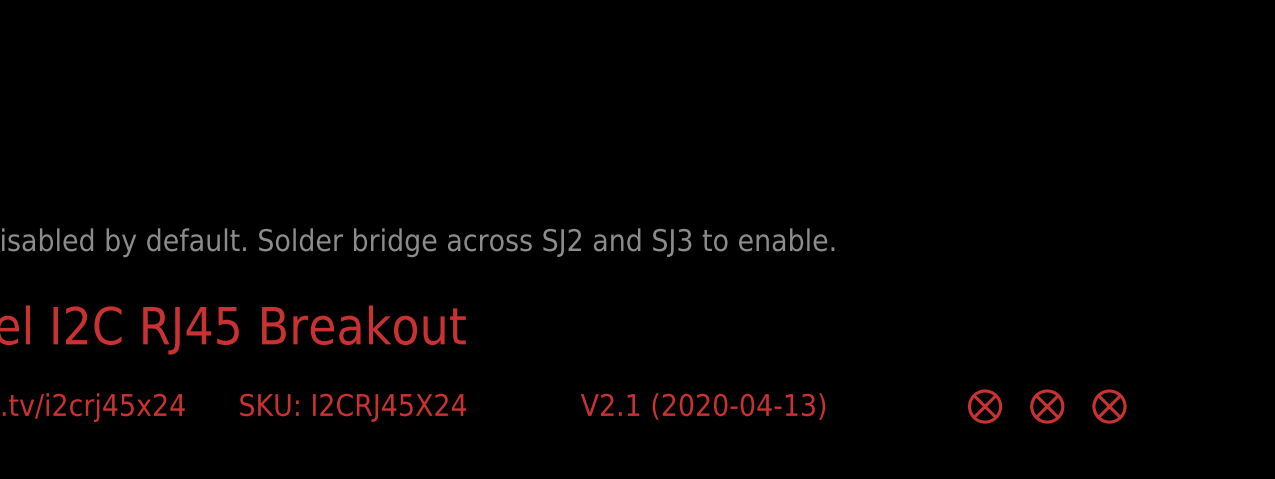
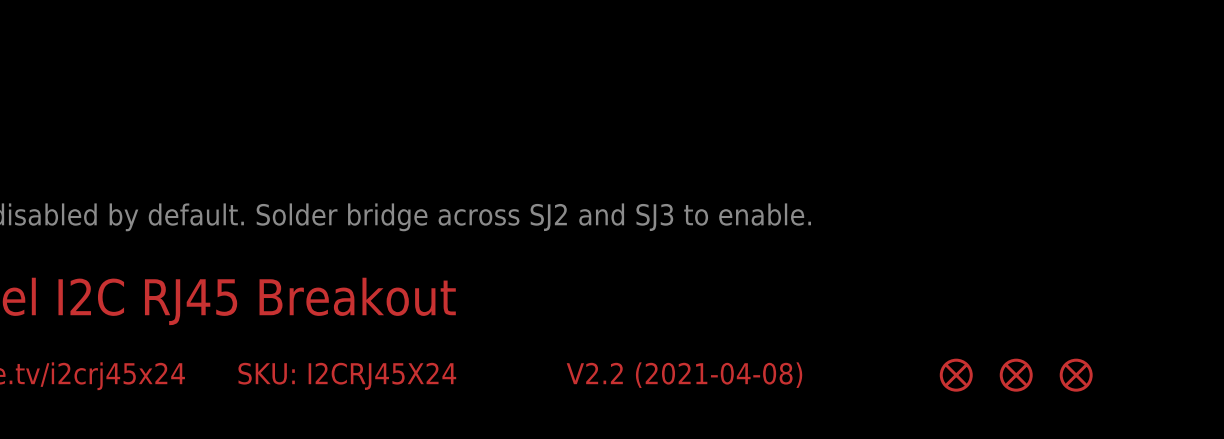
text: V2.1 (2020-04-13) (703, 406) -> V2.2 (2021-04-08) (684, 375)

